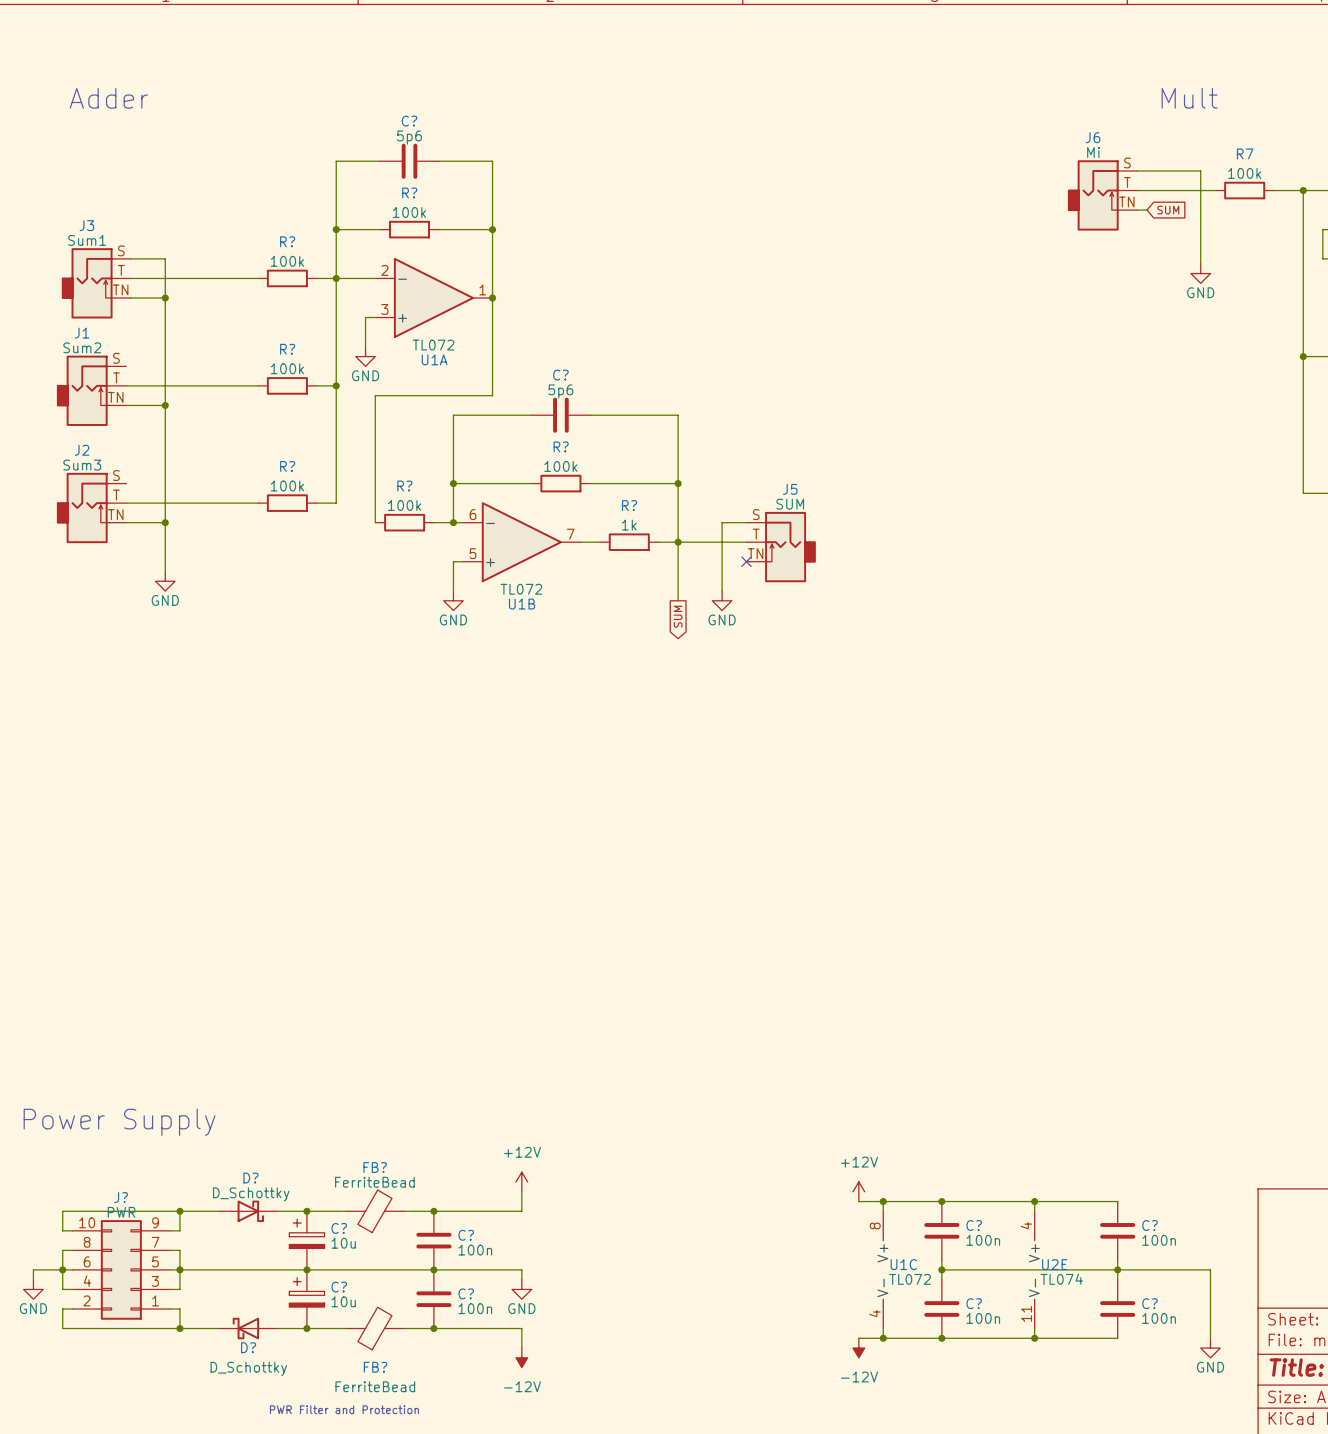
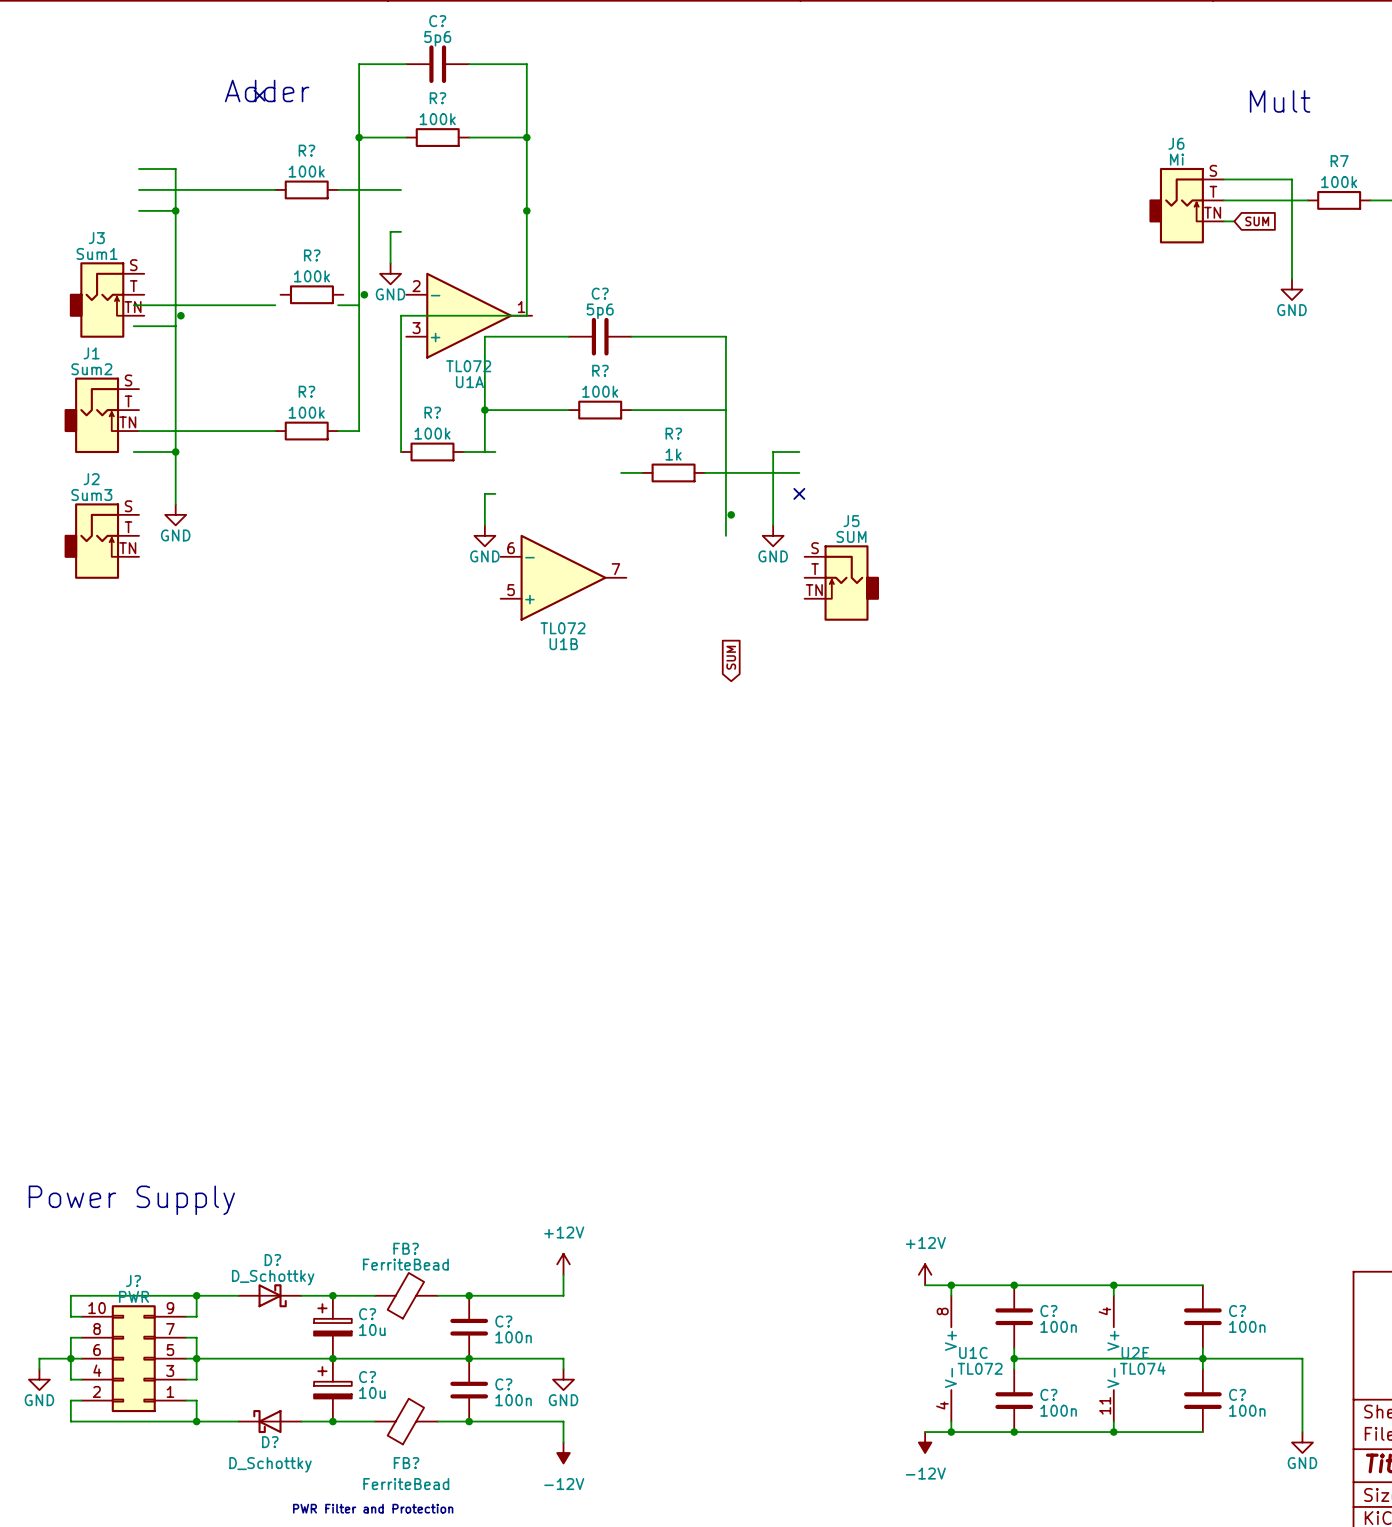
no-connect mark: none -> (259, 95)
text position: Adder (108, 98) -> Adder (267, 90)
junction: none -> (359, 137)
R?: none -> 100k (437, 137)
junction: none -> (526, 137)
wire: (380, 161) (336, 161) (336, 503) (316, 503) -> (406, 64) (359, 64) (359, 431) (338, 431)
C? position: (409, 161) -> (437, 64)
wire: (438, 161) (492, 161) (492, 395) (375, 395) (375, 522) -> (469, 64) (526, 64) (526, 315) (401, 315) (401, 452)
R?: none -> 100k (306, 189)
junction: none -> (175, 210)
wire: (336, 229) (380, 229) -> (359, 137) (406, 137)
junction: (336, 229) -> none
R?: 100k (409, 229) -> none
wire: (438, 229) (492, 229) -> (469, 137) (526, 137)
junction position: (492, 229) -> (526, 210)
wire: (131, 258) (165, 258) (165, 571) -> (139, 168) (175, 168) (175, 504)
power symbol: none -> GND (390, 273)
wire: (131, 278) (258, 278) -> (139, 189) (275, 189)
wire: (316, 278) (375, 278) -> (338, 189) (401, 189)
wire: (131, 297) (165, 297) -> (139, 210) (175, 210)
junction: (492, 297) -> none
wire: none -> (133, 326) (175, 326)
wire: (375, 317) (365, 317) (365, 346) -> (401, 231) (390, 231) (390, 263)
power symbol: GND (365, 356) -> none
wire: (126, 385) (258, 385) -> (133, 305) (275, 305)
R? position: (287, 385) -> (306, 431)
wire: (316, 385) (336, 385) -> (338, 305) (359, 305)
junction: (336, 385) -> none
junction: none -> (484, 410)
R?: none -> 100k (600, 410)
wire: none -> (180, 431) (275, 431)
junction position: (165, 405) -> (175, 452)
wire: (531, 415) (453, 415) (453, 522) -> (568, 336) (484, 336) (484, 452)
C? position: (560, 415) -> (600, 336)
wire: (590, 415) (678, 415) (678, 600) -> (631, 336) (725, 336) (725, 535)
R?: none -> 100k (432, 452)
no-connect mark: none -> (799, 493)
wire: (453, 483) (531, 483) -> (484, 410) (568, 410)
junction: (453, 483) -> none
R?: 100k (560, 483) -> none
wire: (590, 483) (678, 483) -> (631, 410) (725, 410)
wire: (126, 503) (258, 503) -> none
R?: 100k (287, 503) -> none
power symbol: none -> GND (484, 535)
wire: (126, 522) (165, 522) -> (133, 452) (175, 452)
junction: (165, 522) -> none
R?: 100k (404, 522) -> none
wire: (433, 522) (463, 522) -> (463, 452) (495, 452)
junction: (453, 522) -> none
wire: (746, 522) (722, 522) (722, 591) -> (799, 452) (773, 452) (773, 525)
wire: (580, 542) (599, 542) -> (621, 472) (642, 472)
R? position: (629, 542) -> (673, 472)
wire: (658, 542) (746, 542) -> (705, 472) (799, 472)
junction: (678, 542) -> none
wire: (463, 561) (453, 561) (453, 591) -> (495, 493) (484, 493) (484, 525)
no-connect mark: (746, 561) -> none
power symbol position: GND (165, 581) -> GND (175, 514)
power symbol: GND (453, 600) -> none
power symbol position: GND (722, 600) -> GND (773, 535)

